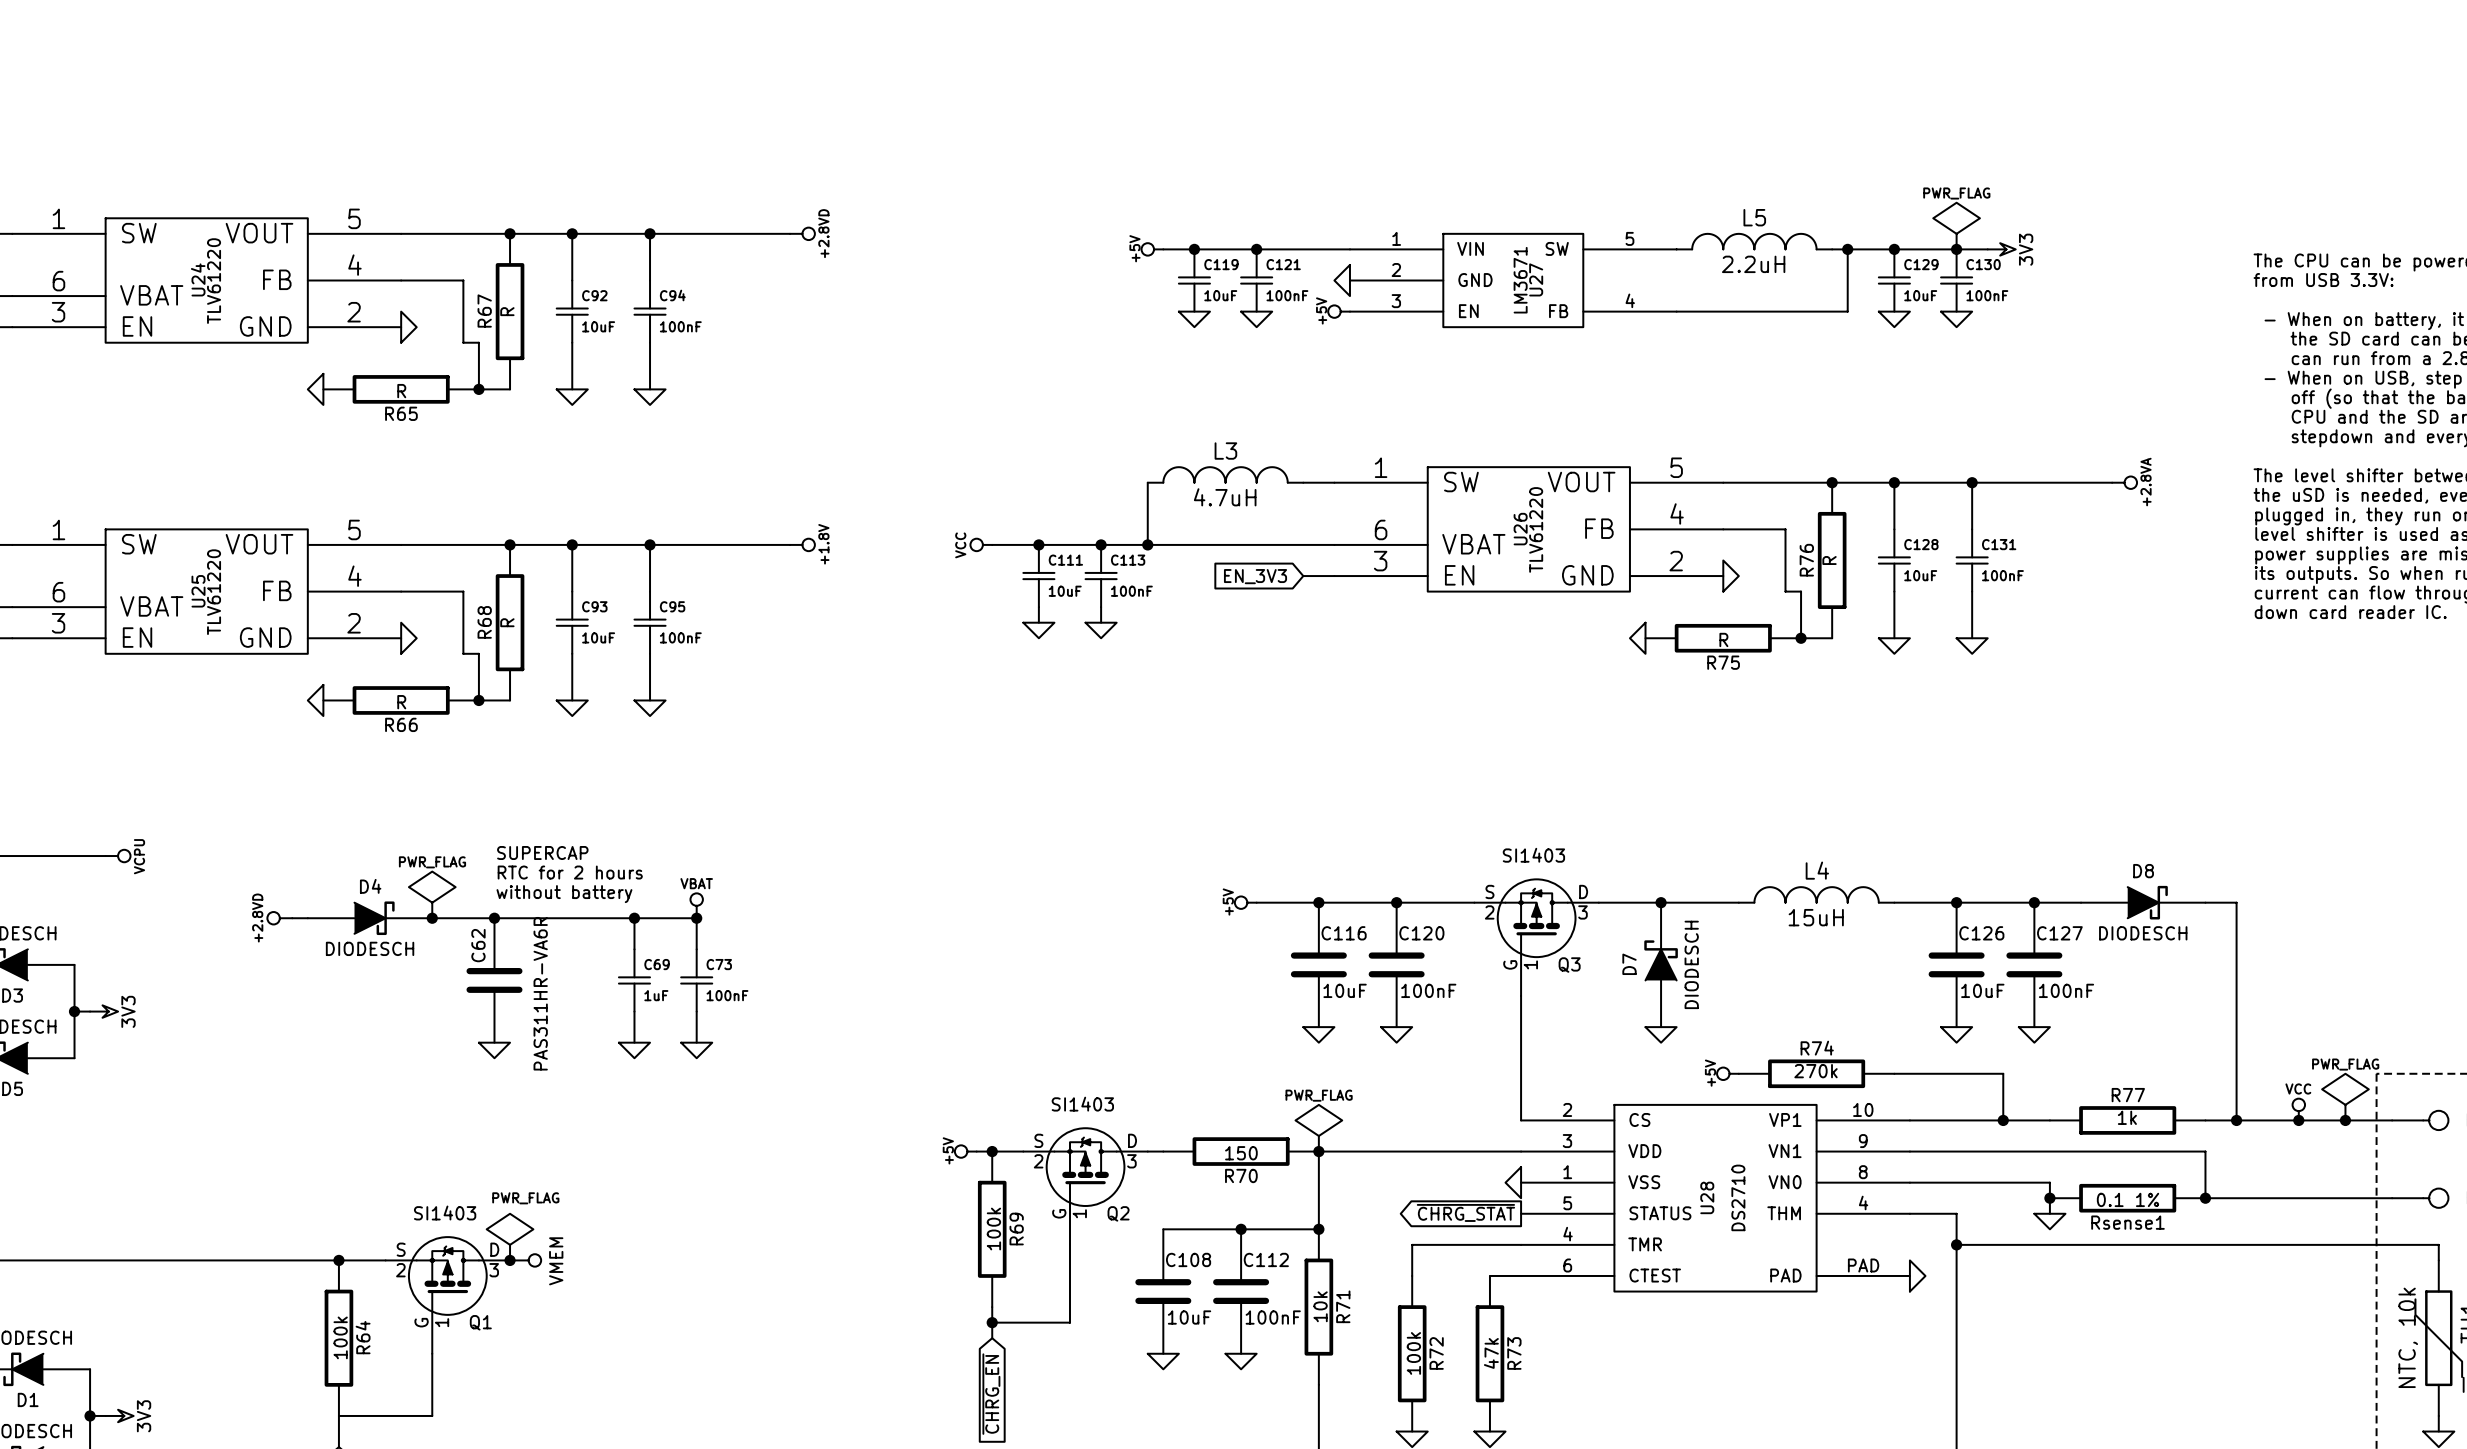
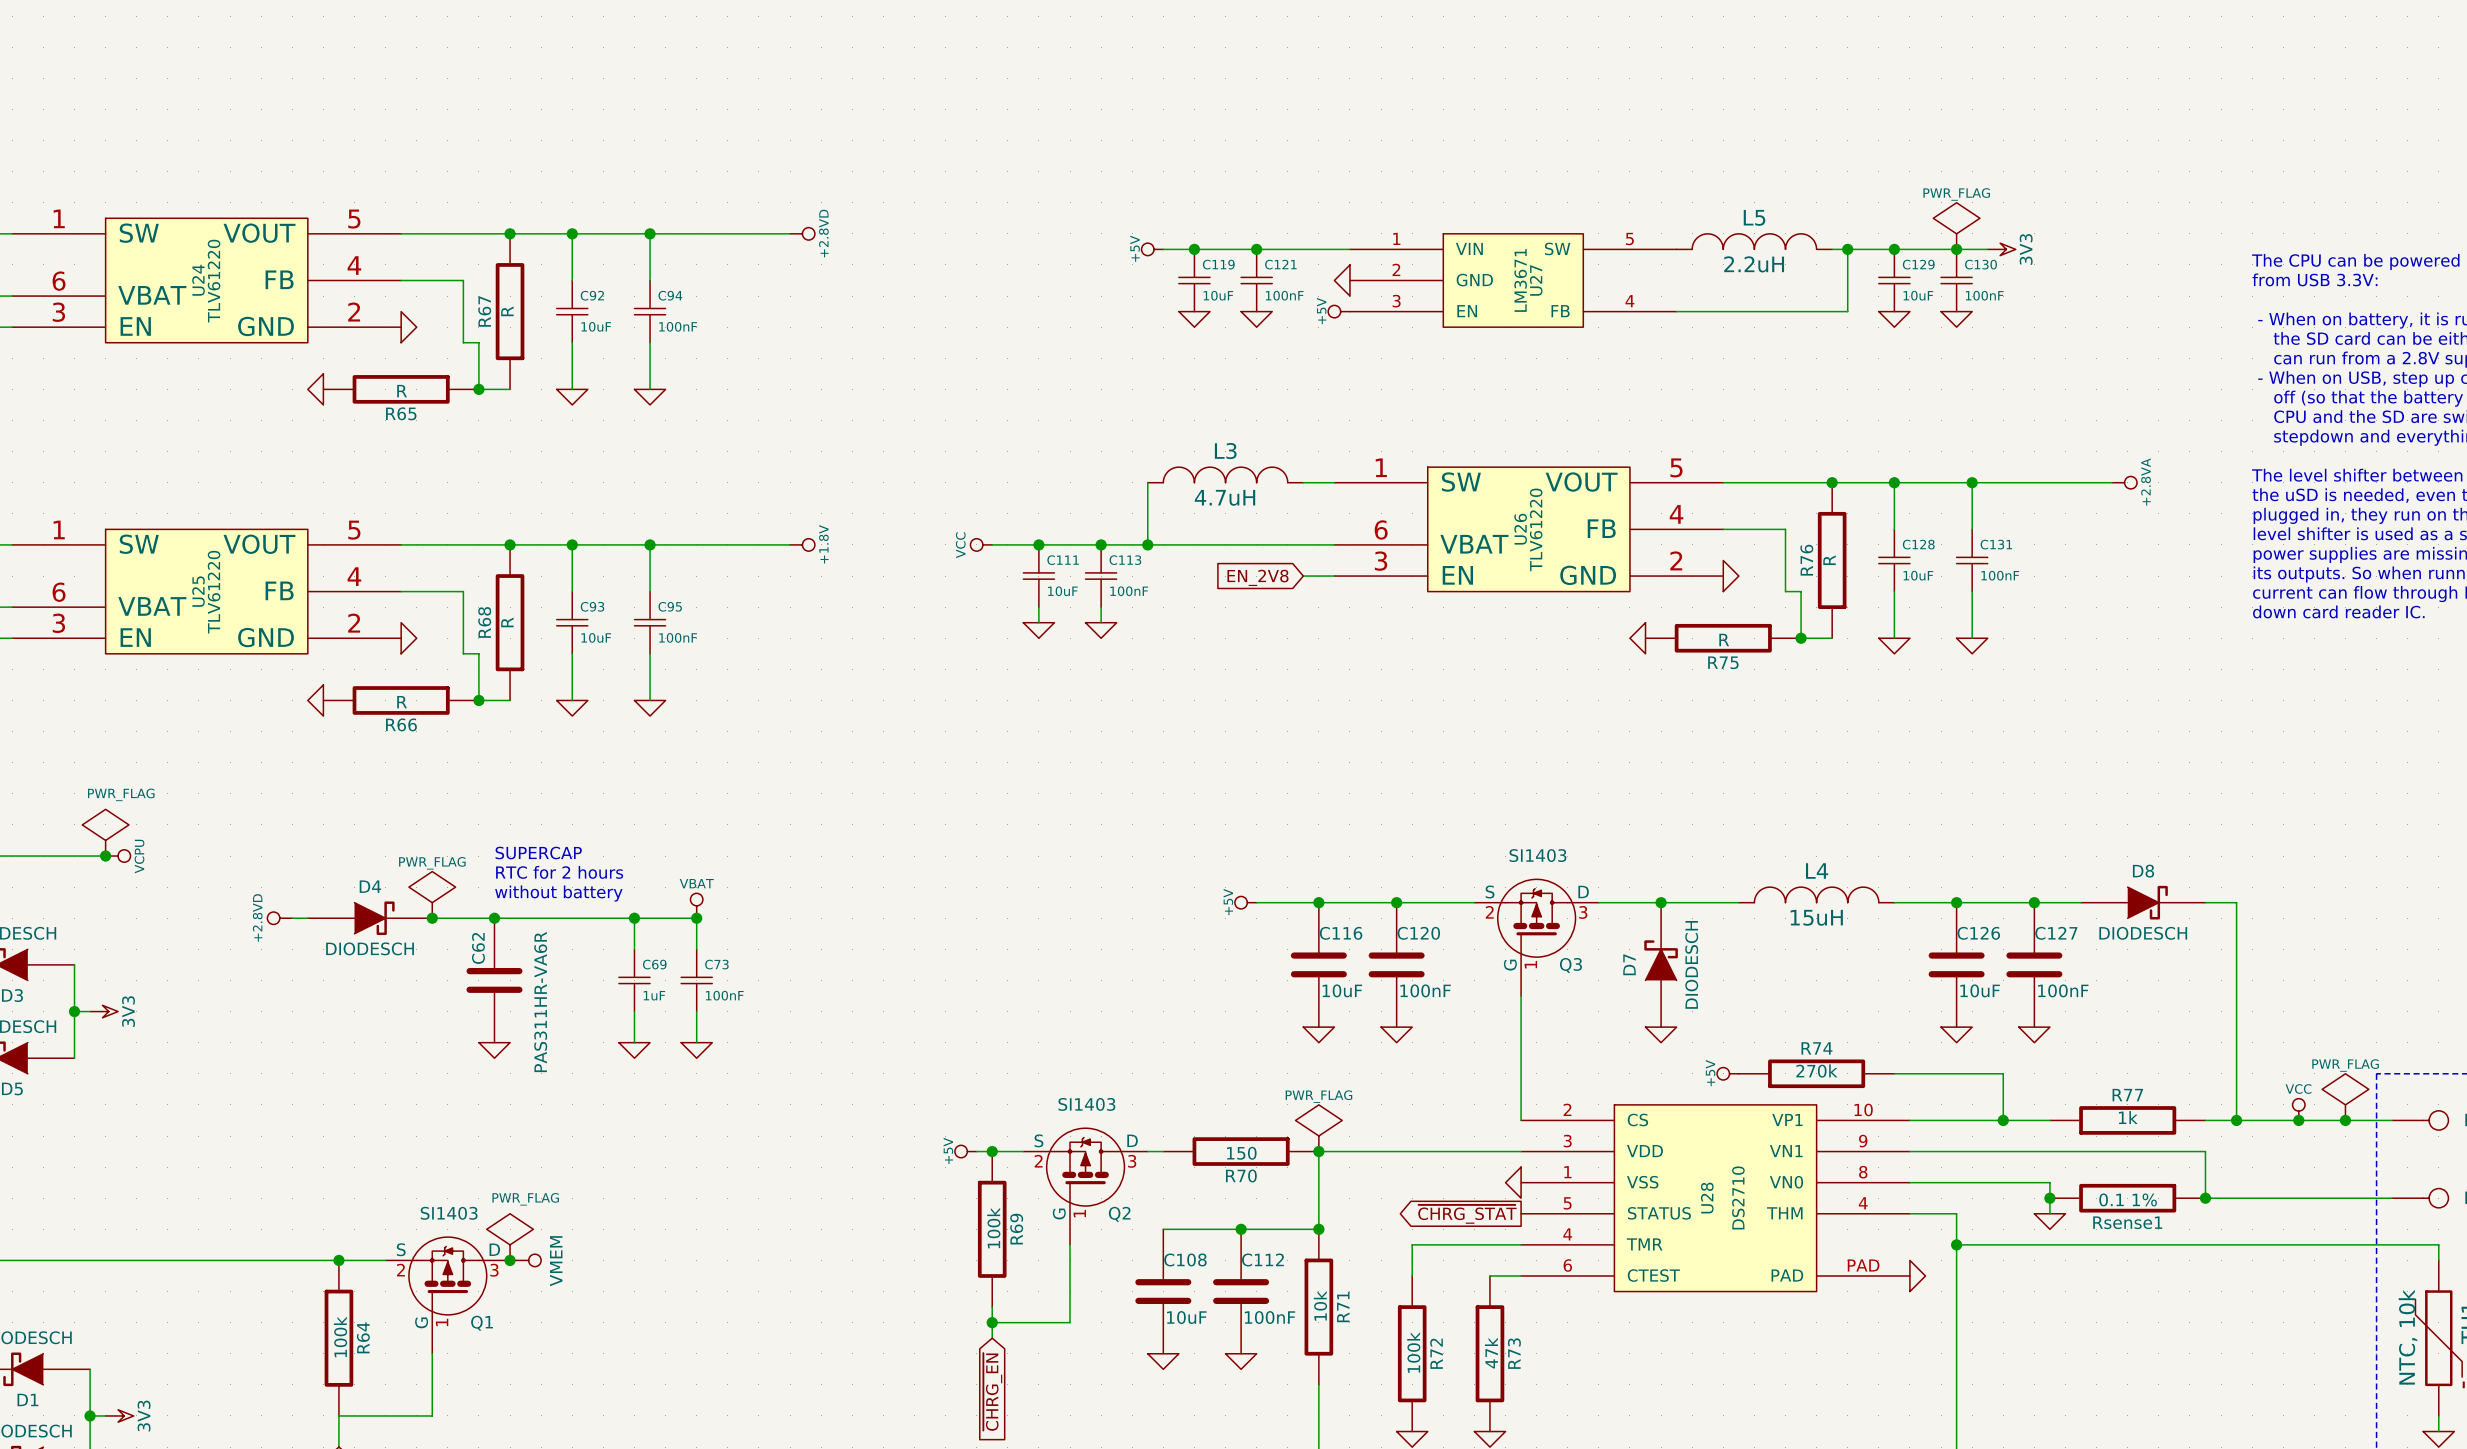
global label: EN_3V3 (1255, 576) -> EN_2V8 (1257, 577)
power symbol: none -> PWR_FLAG (105, 832)
junction: none -> (105, 856)

